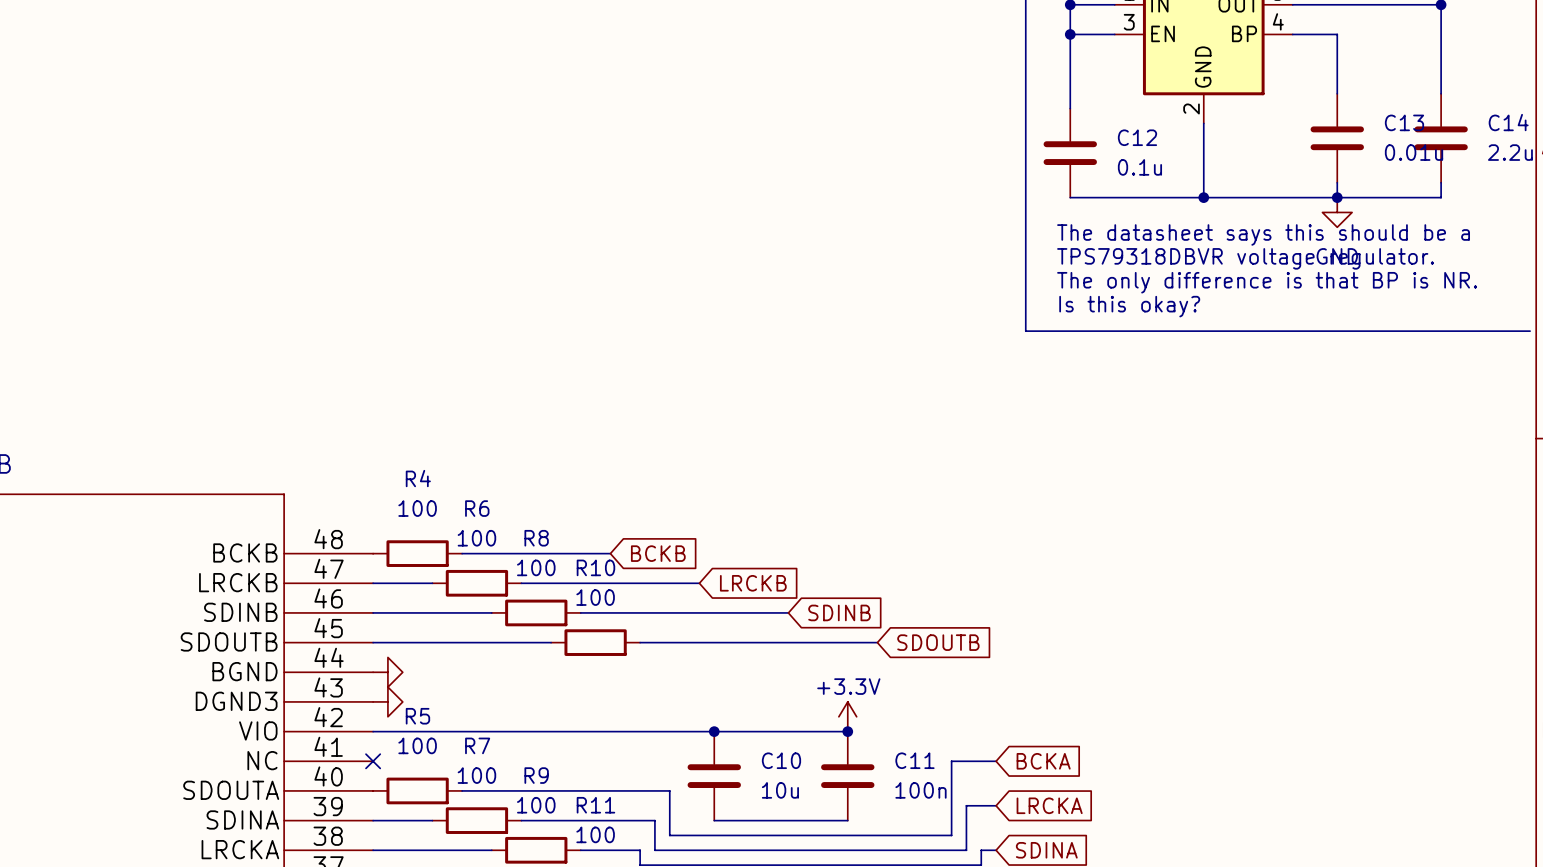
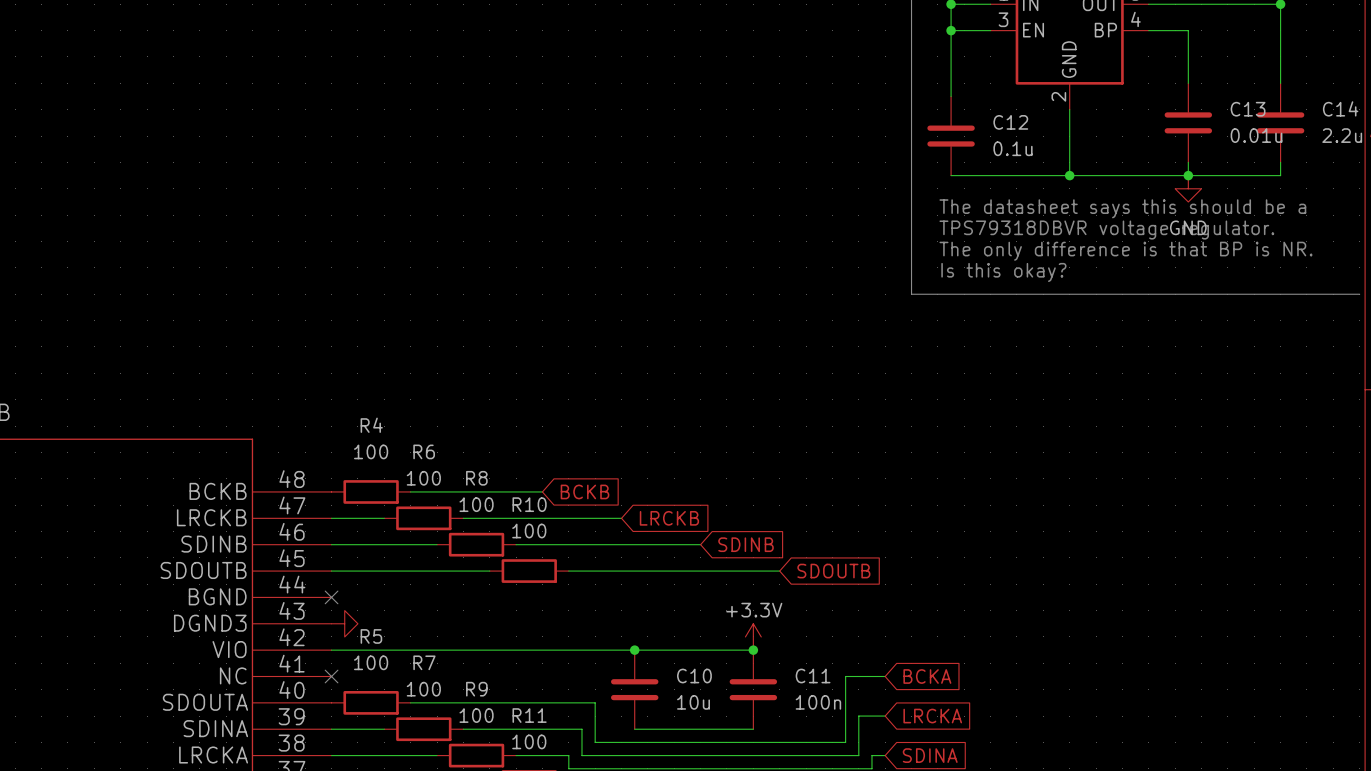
no-connect mark: none -> (331, 597)
power symbol: (387, 672) -> none

